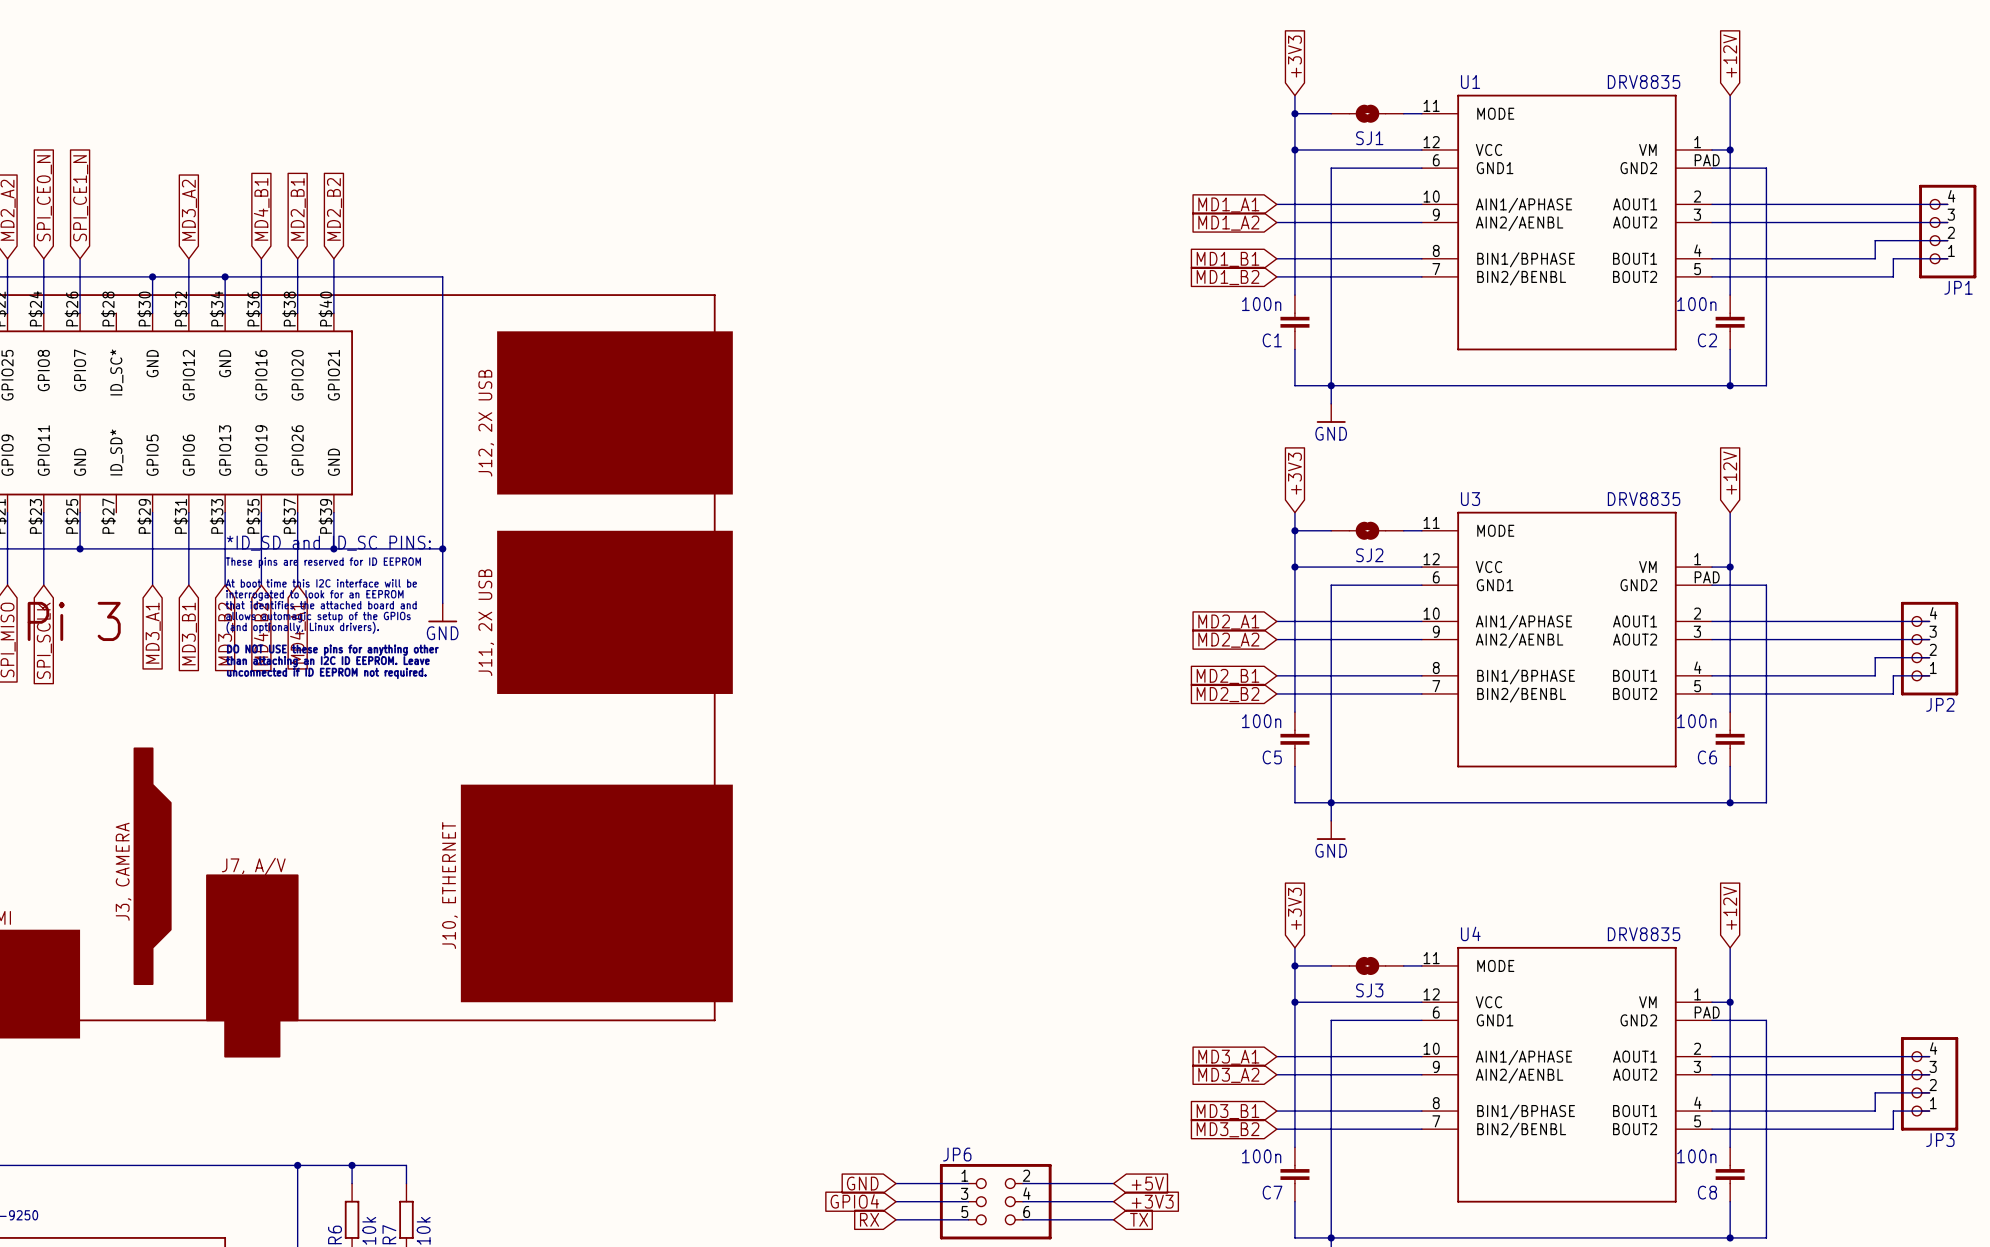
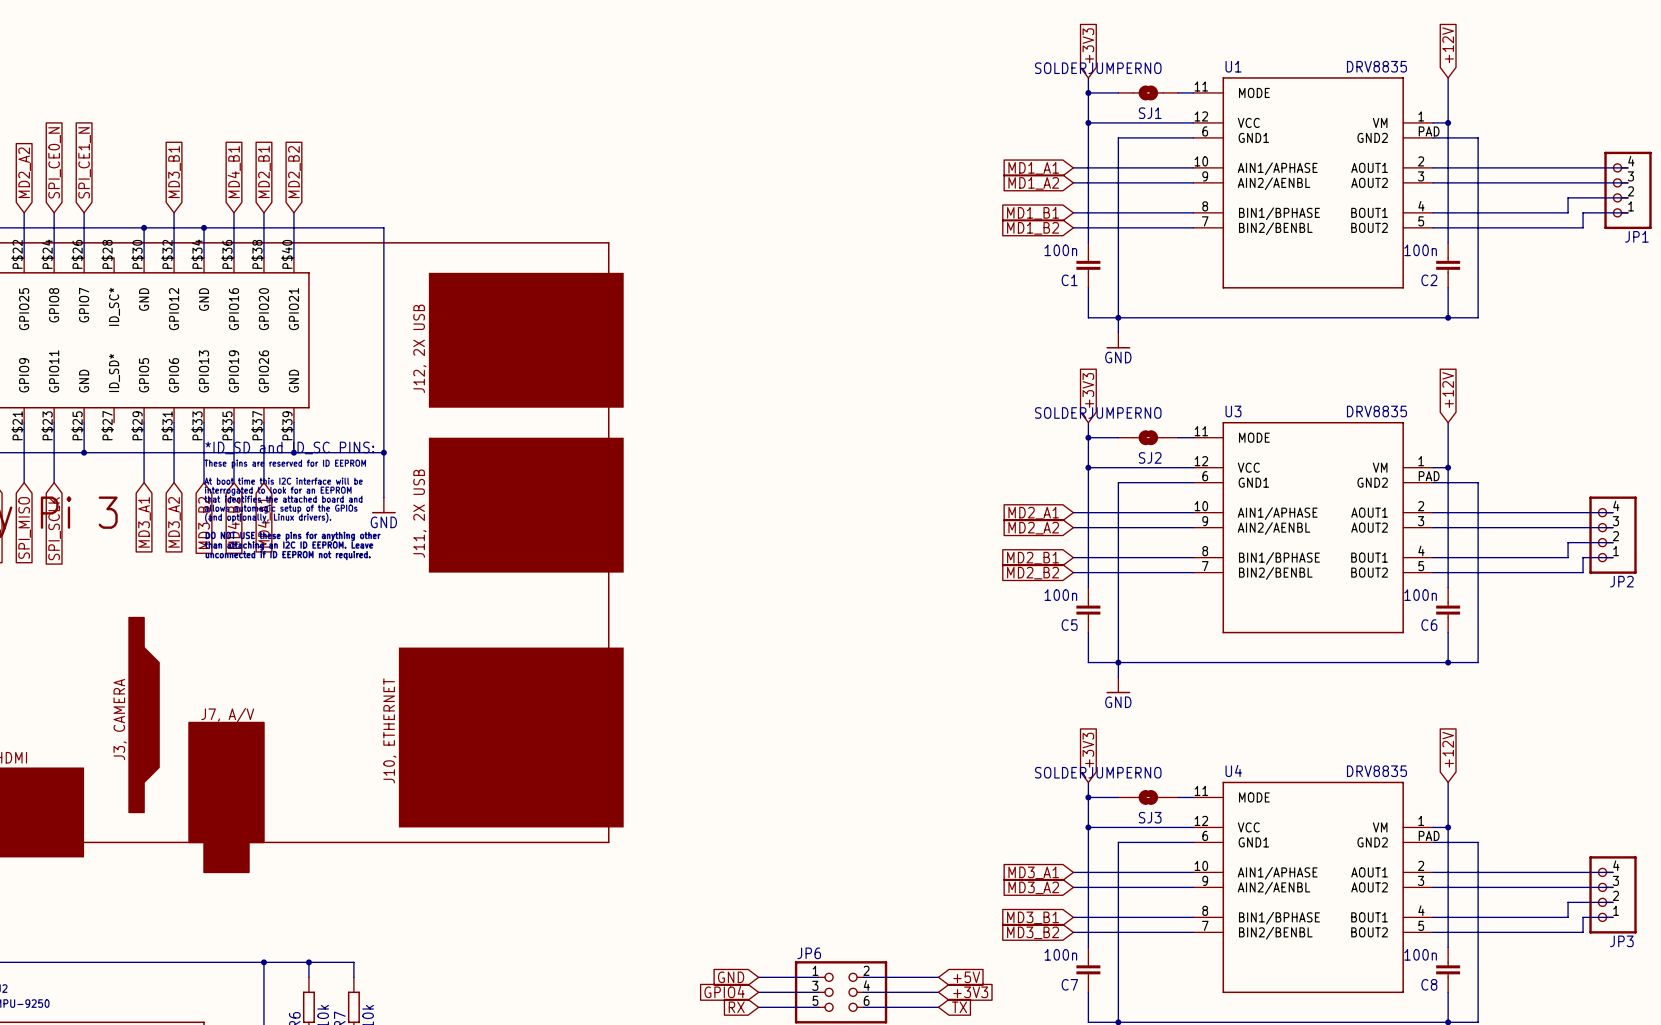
SJ1 value: none -> SOLDERJUMPERNO (1098, 68)
global label: MD3_A2 (189, 210) -> MD3_B1 (174, 172)
SJ2 value: none -> SOLDERJUMPERNO (1098, 412)
global label: MD3_B1 (189, 633) -> MD3_A2 (174, 522)
SJ3 value: none -> SOLDERJUMPERNO (1098, 772)

